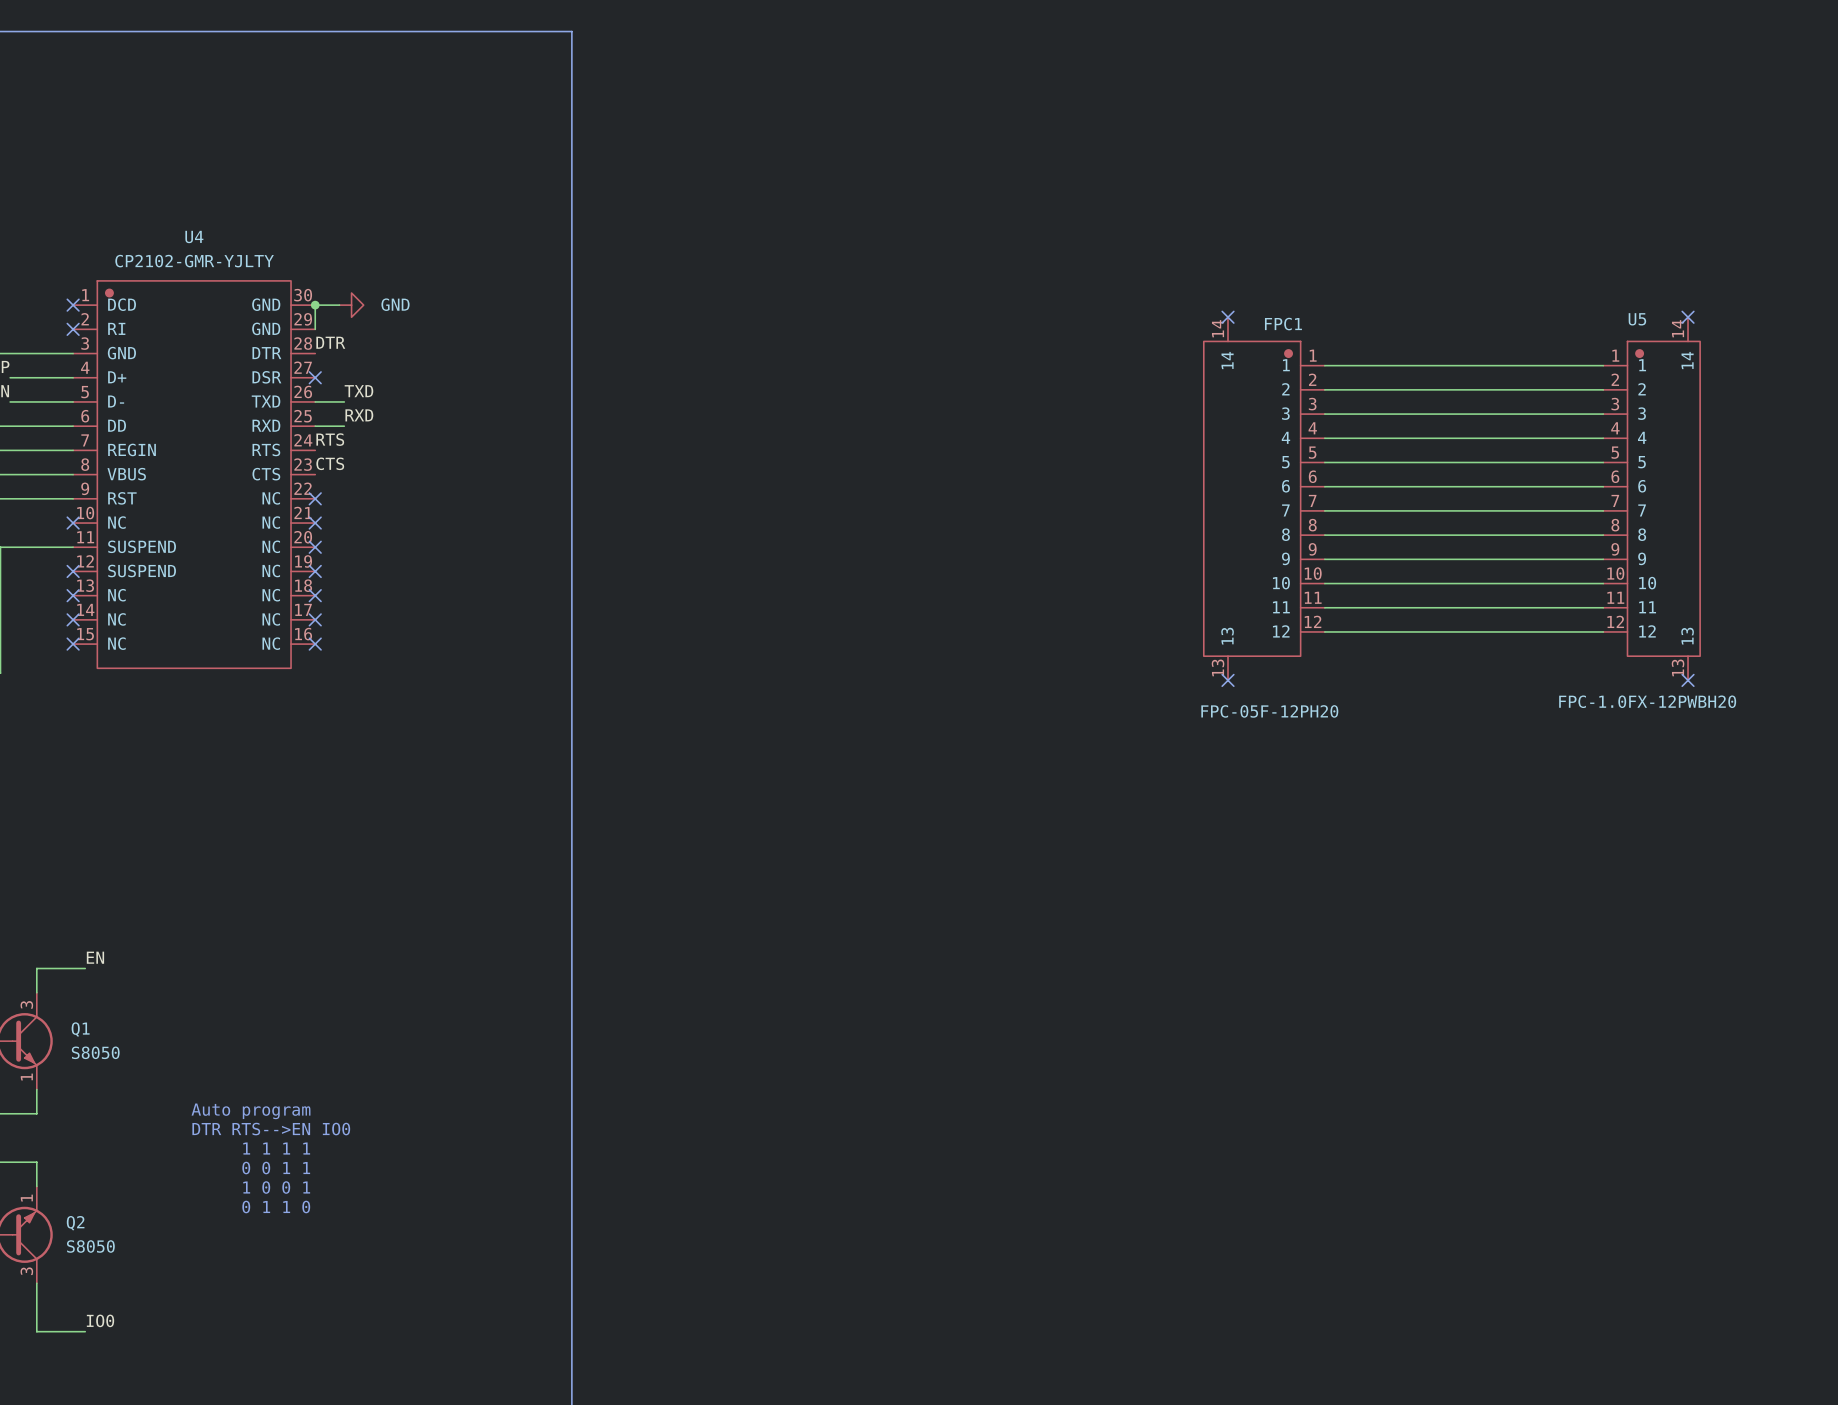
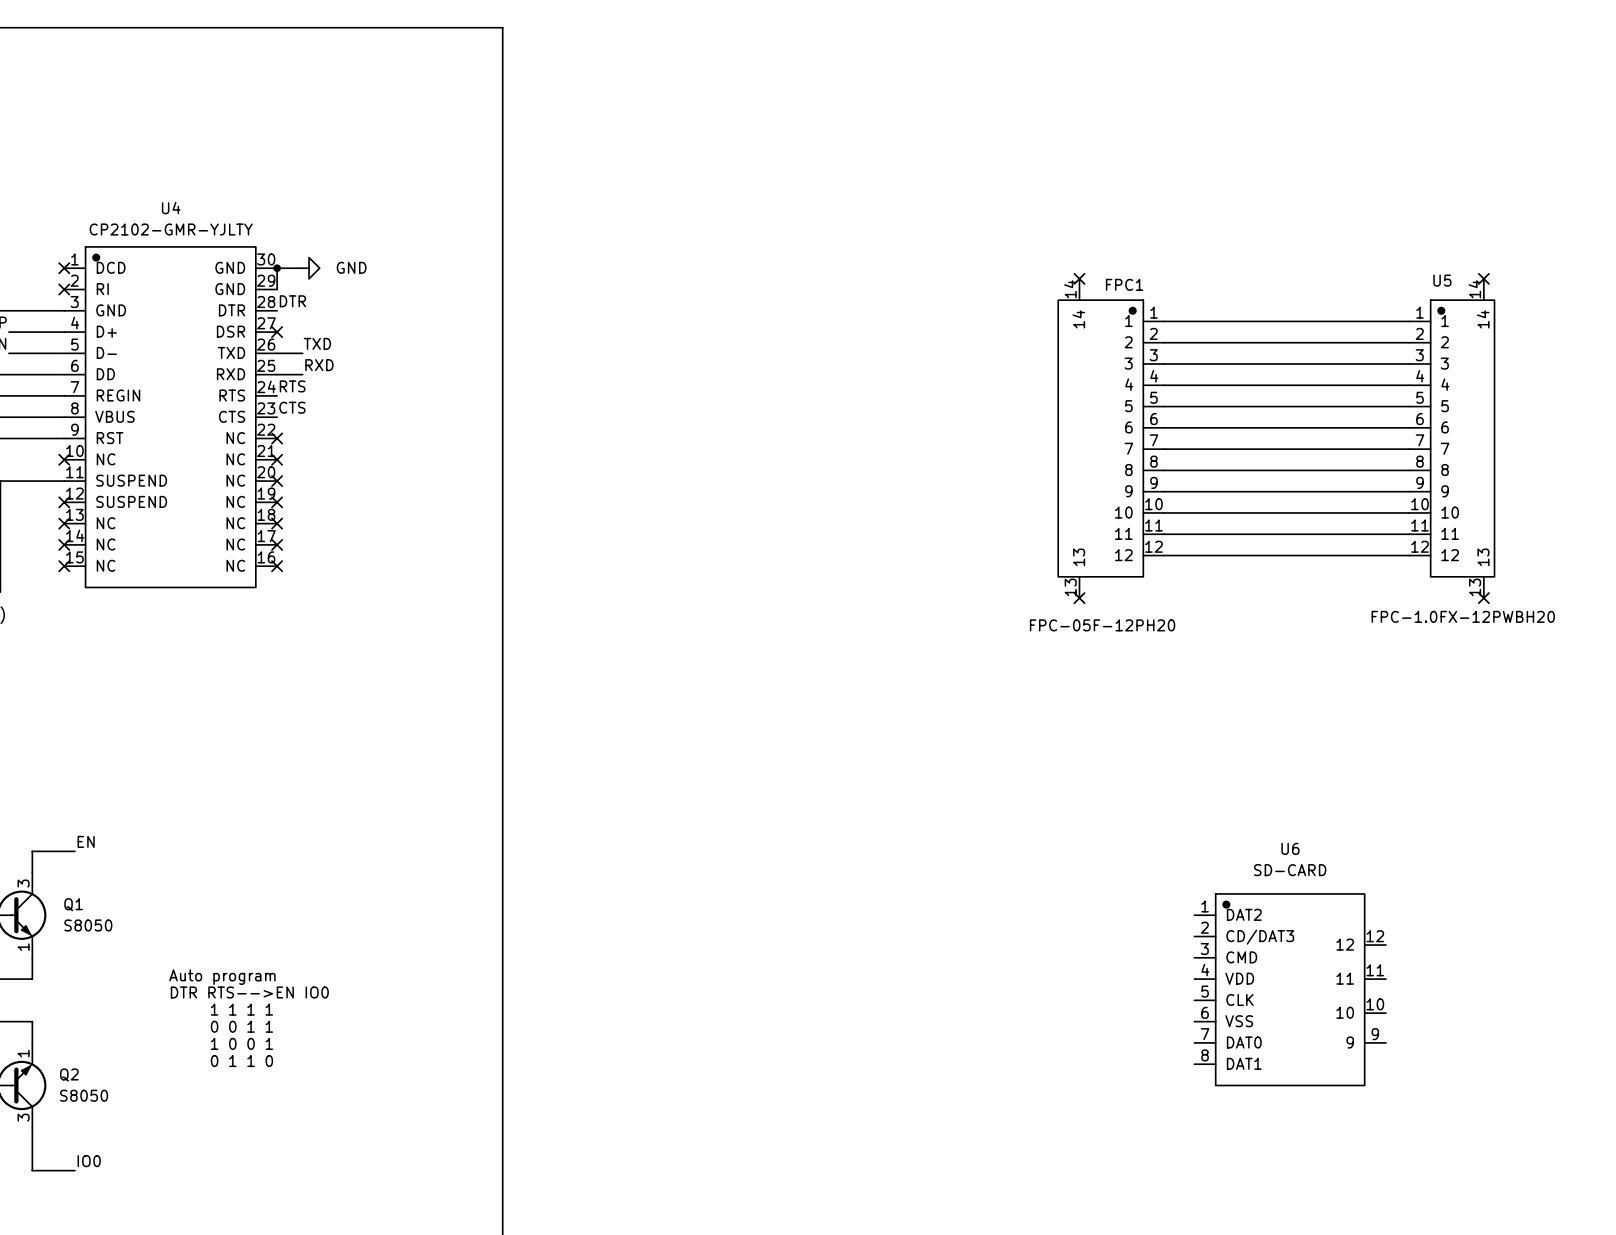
U6: none -> SD-CARD (1290, 989)

